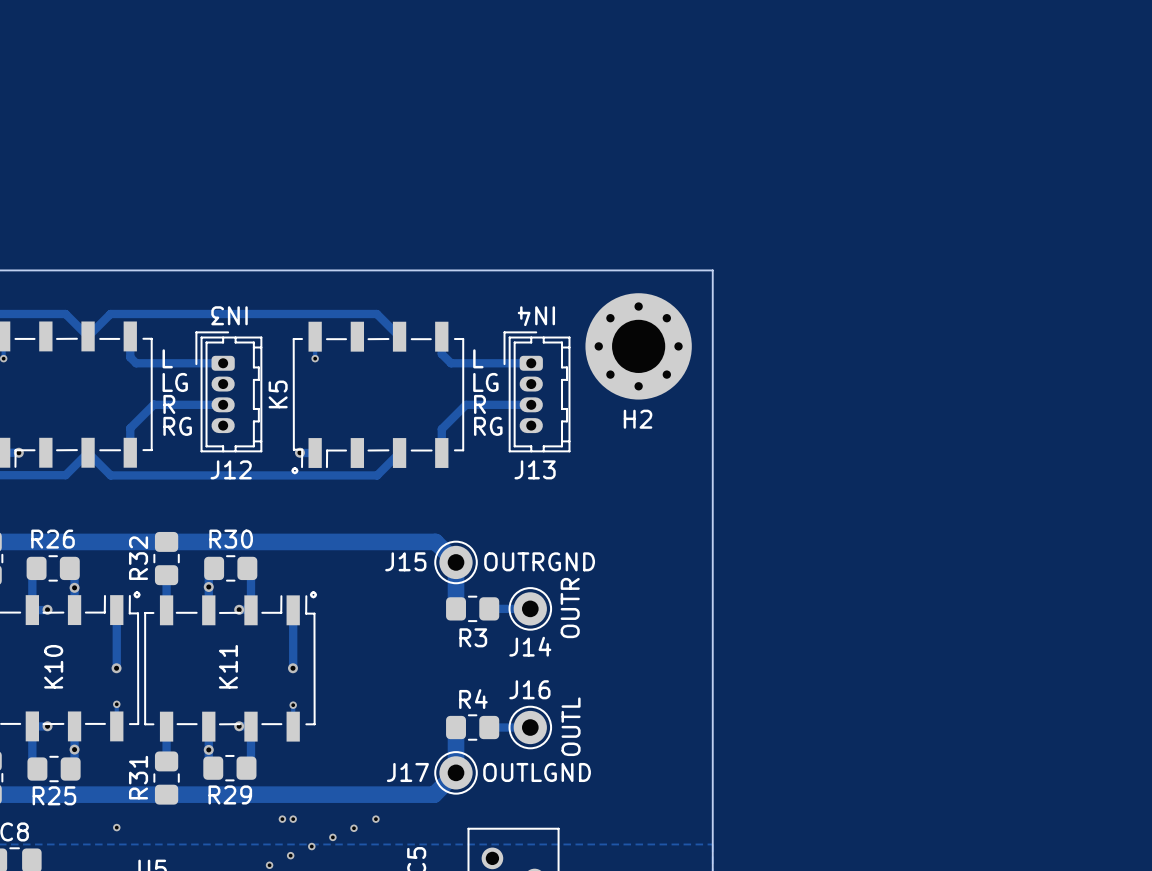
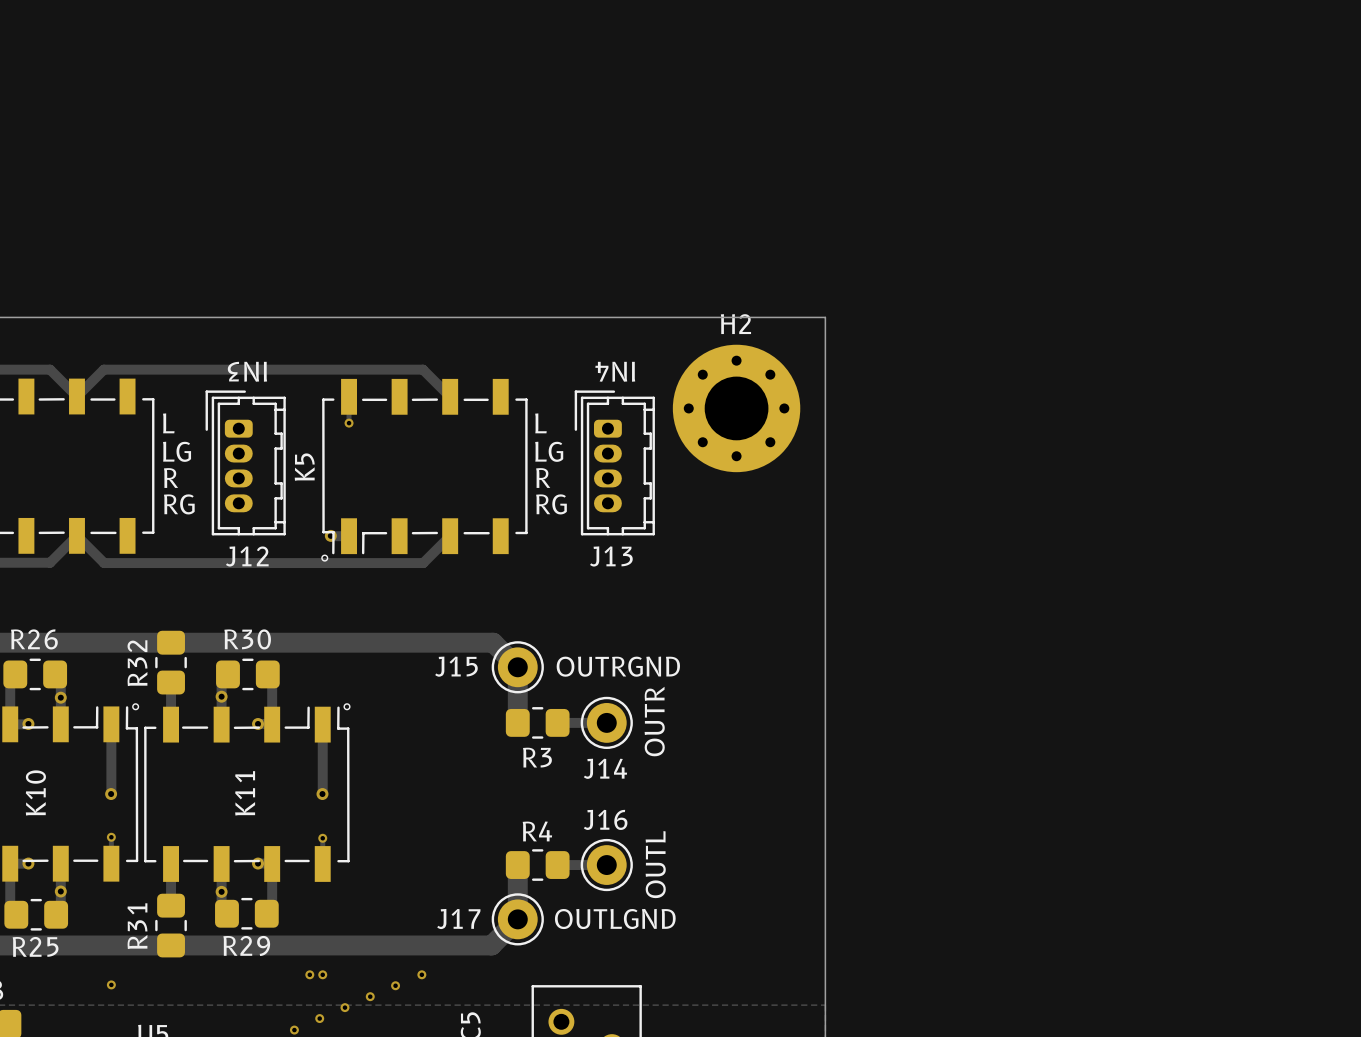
track: (130, 336) (130, 357) (136, 363) (223, 363) -> none
track: (441, 336) (441, 353) (451, 363) (531, 363) -> none
track: (153, 404) (130, 428) (130, 452) -> none
track: (154, 404) (223, 404) -> none
track: (531, 404) (466, 404) (441, 429) (441, 453) -> none
H2 name position: H2 (638, 419) -> H2 (735, 324)

